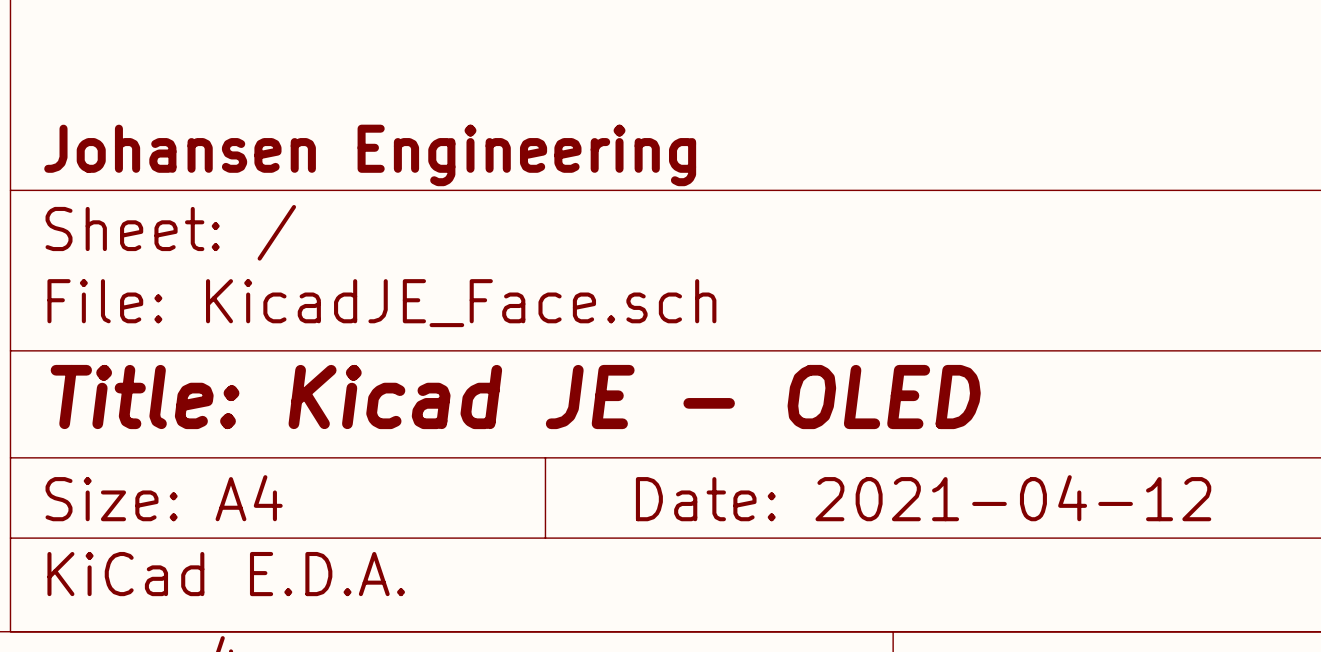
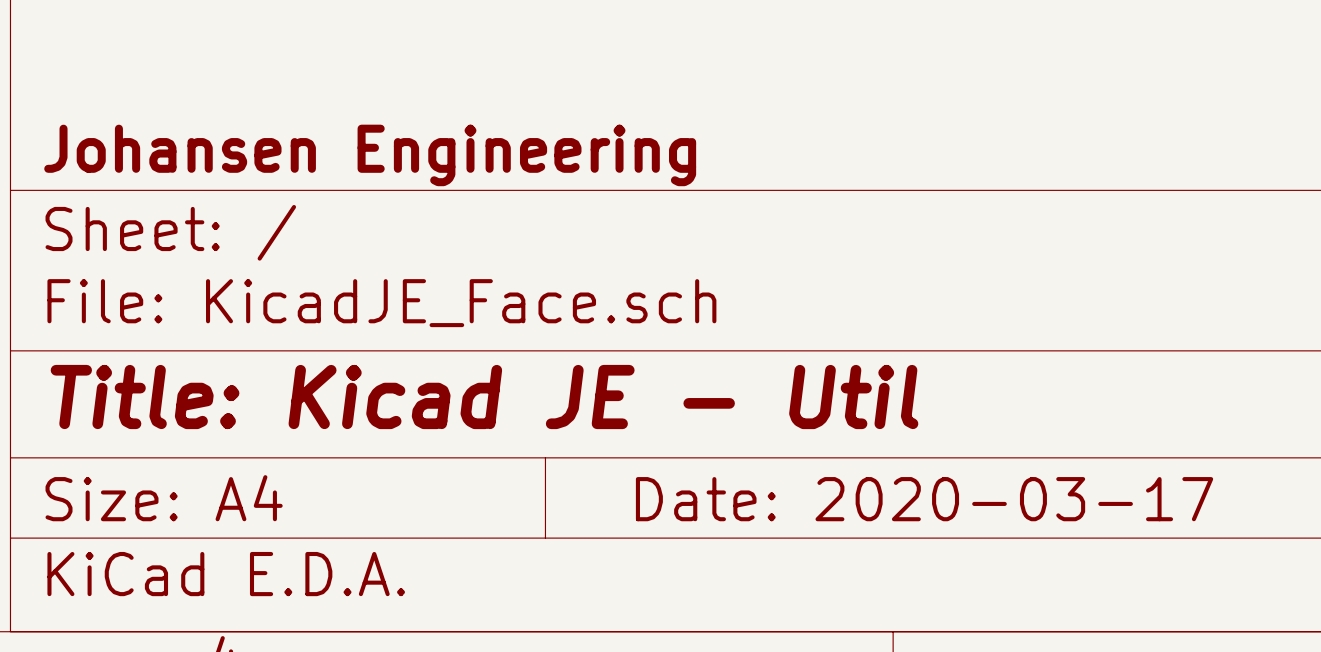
title block: Title: Kicad JE - OLED (515, 397) -> Title: Kicad JE - Util (484, 397)
title block: Date: 2021-04-12 (923, 498) -> Date: 2020-03-17 (924, 499)

